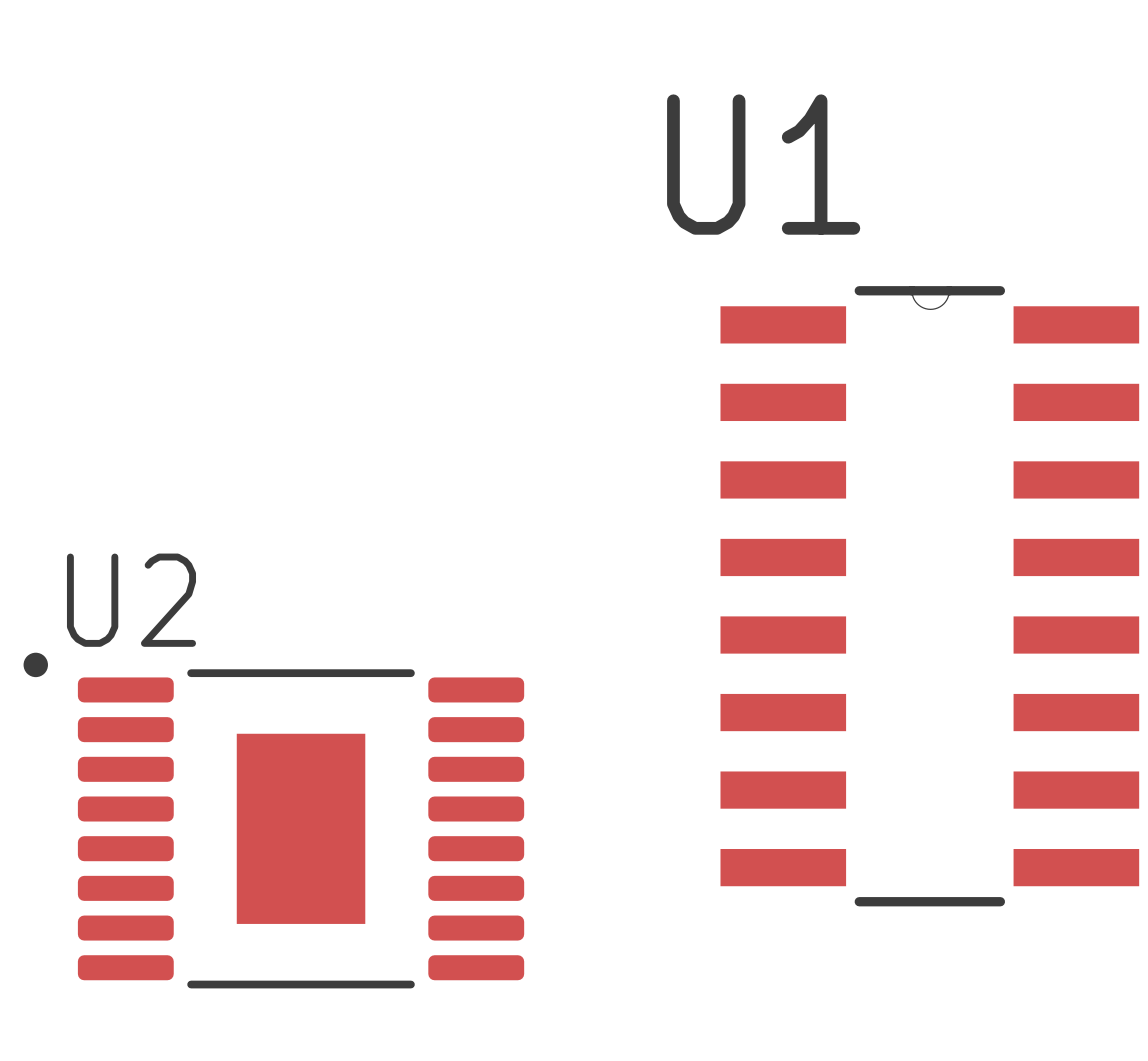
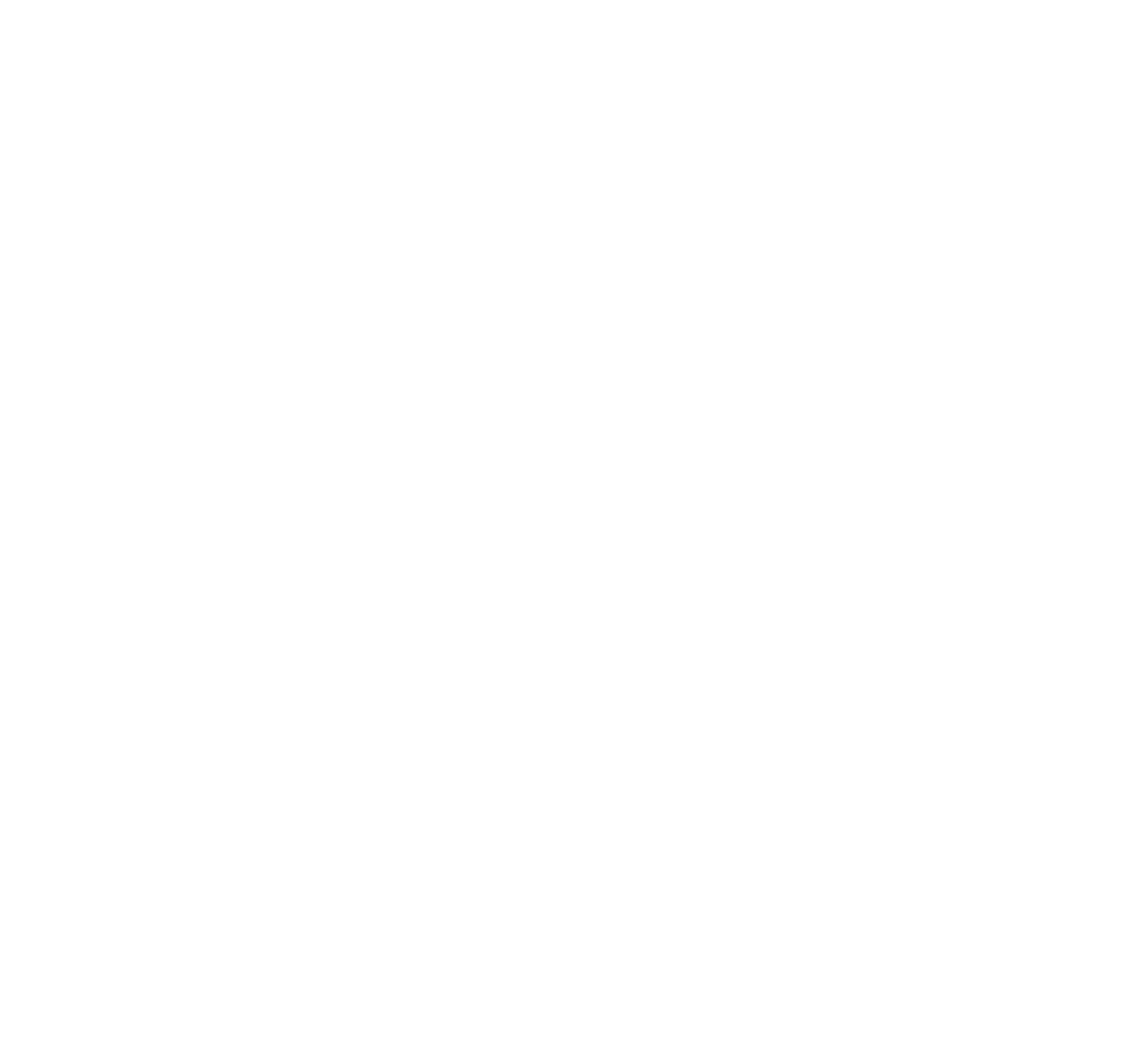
U1: (929, 596) -> none
U2: (273, 820) -> none

